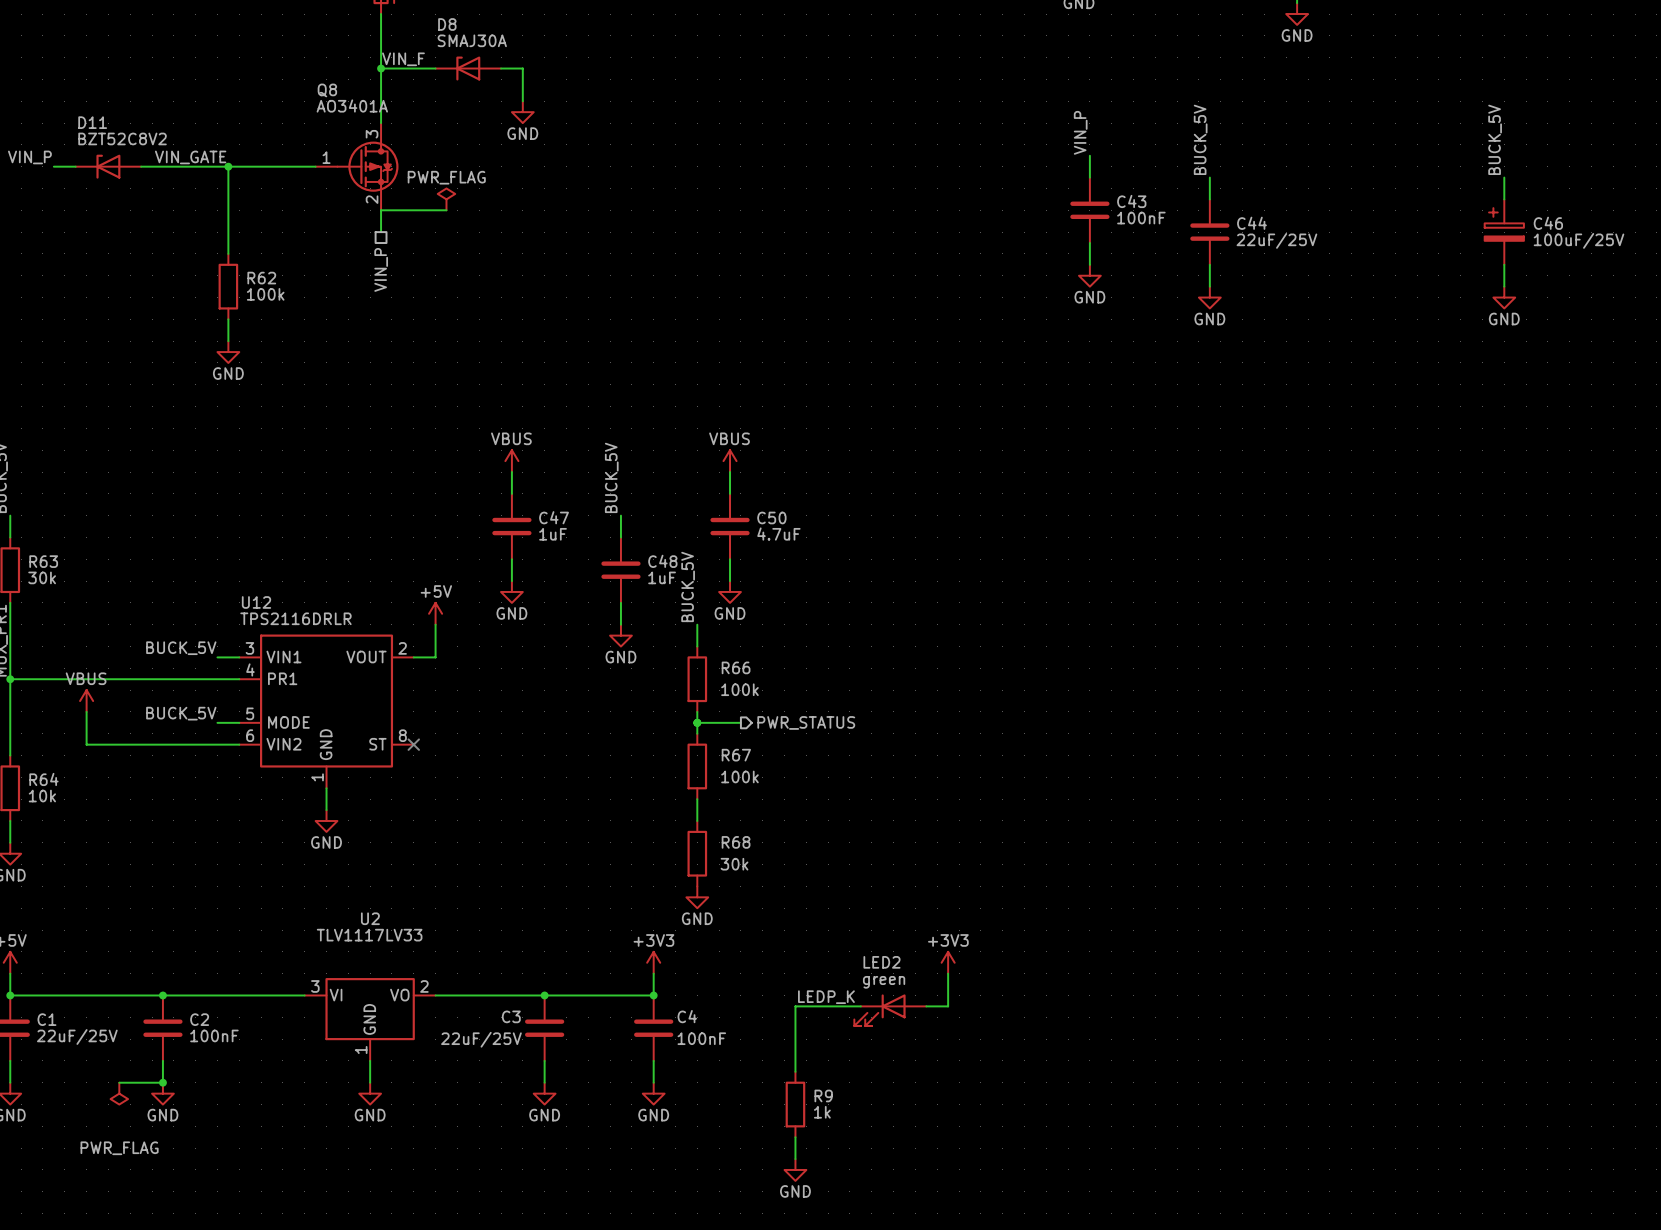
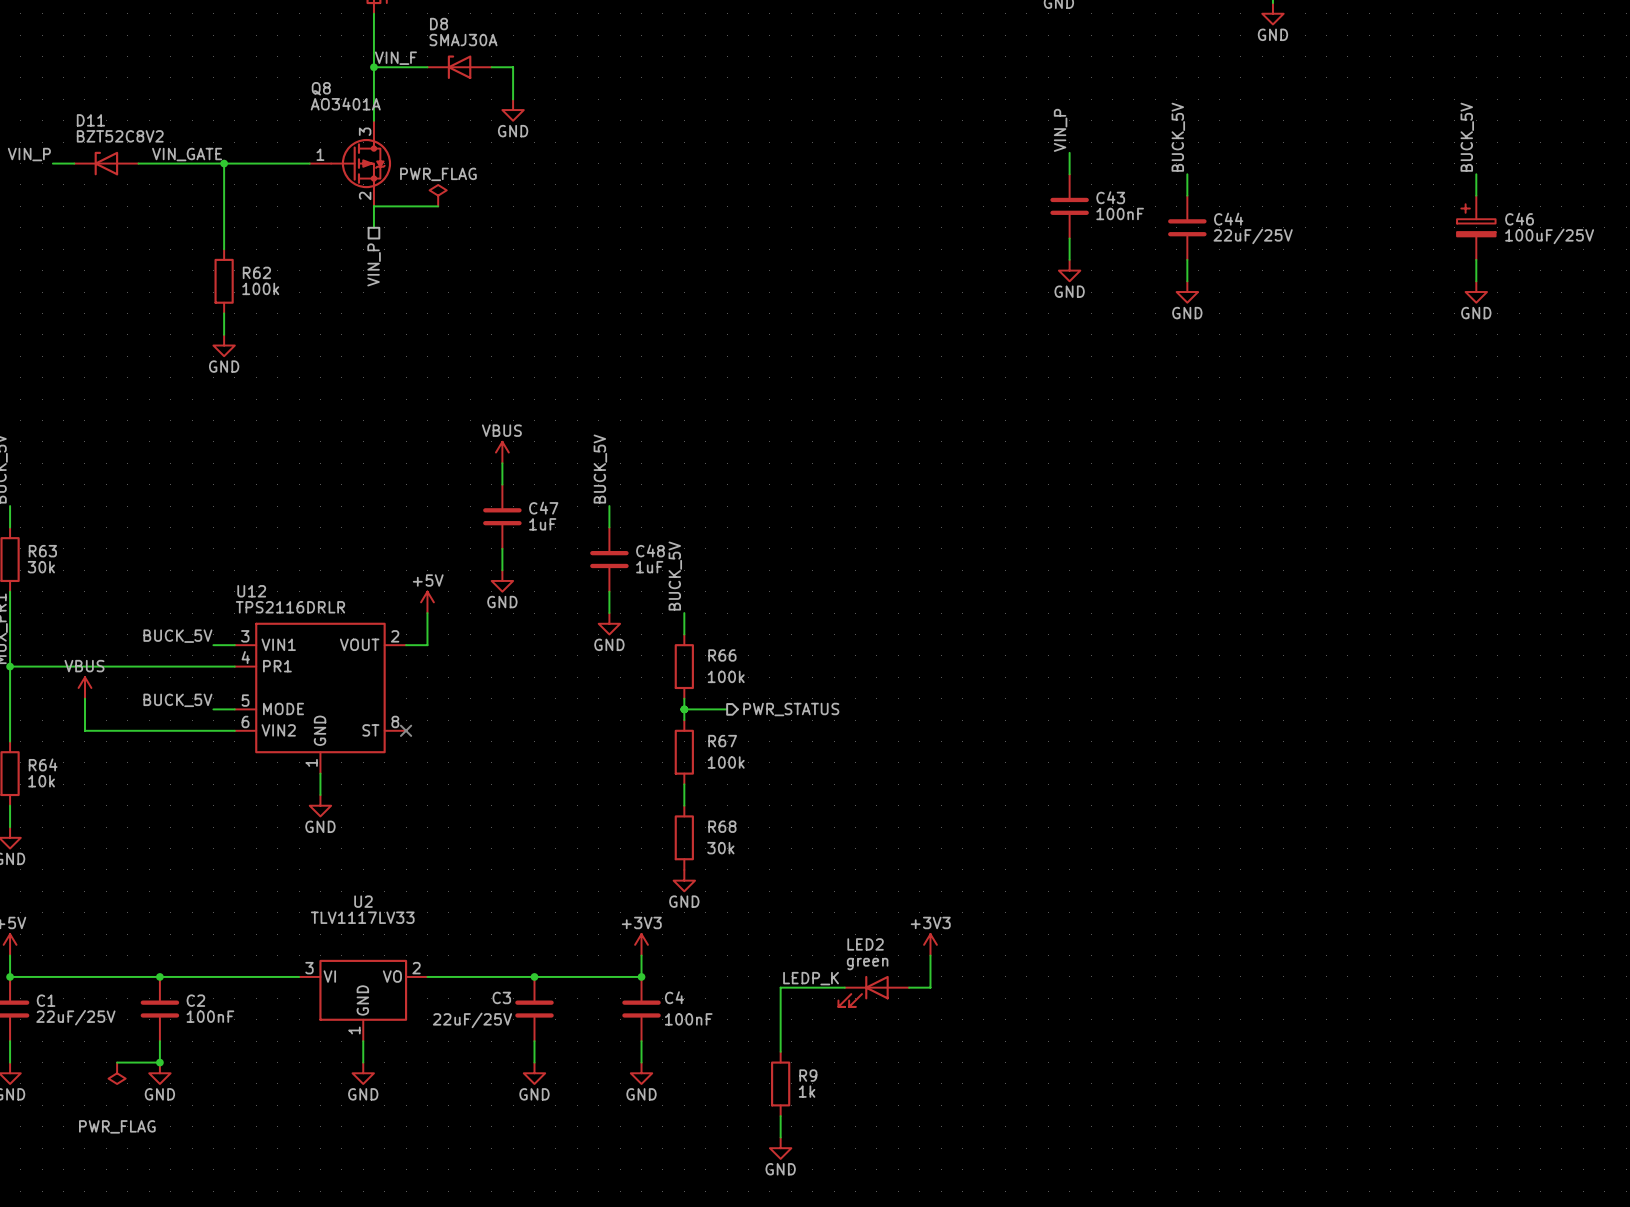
power symbol: VBUS (730, 461) -> none
wire: (730, 472) (730, 493) -> none
C50: 4.7uF (730, 526) -> none
wire: (730, 559) (730, 581) -> none
power symbol: GND (730, 591) -> none

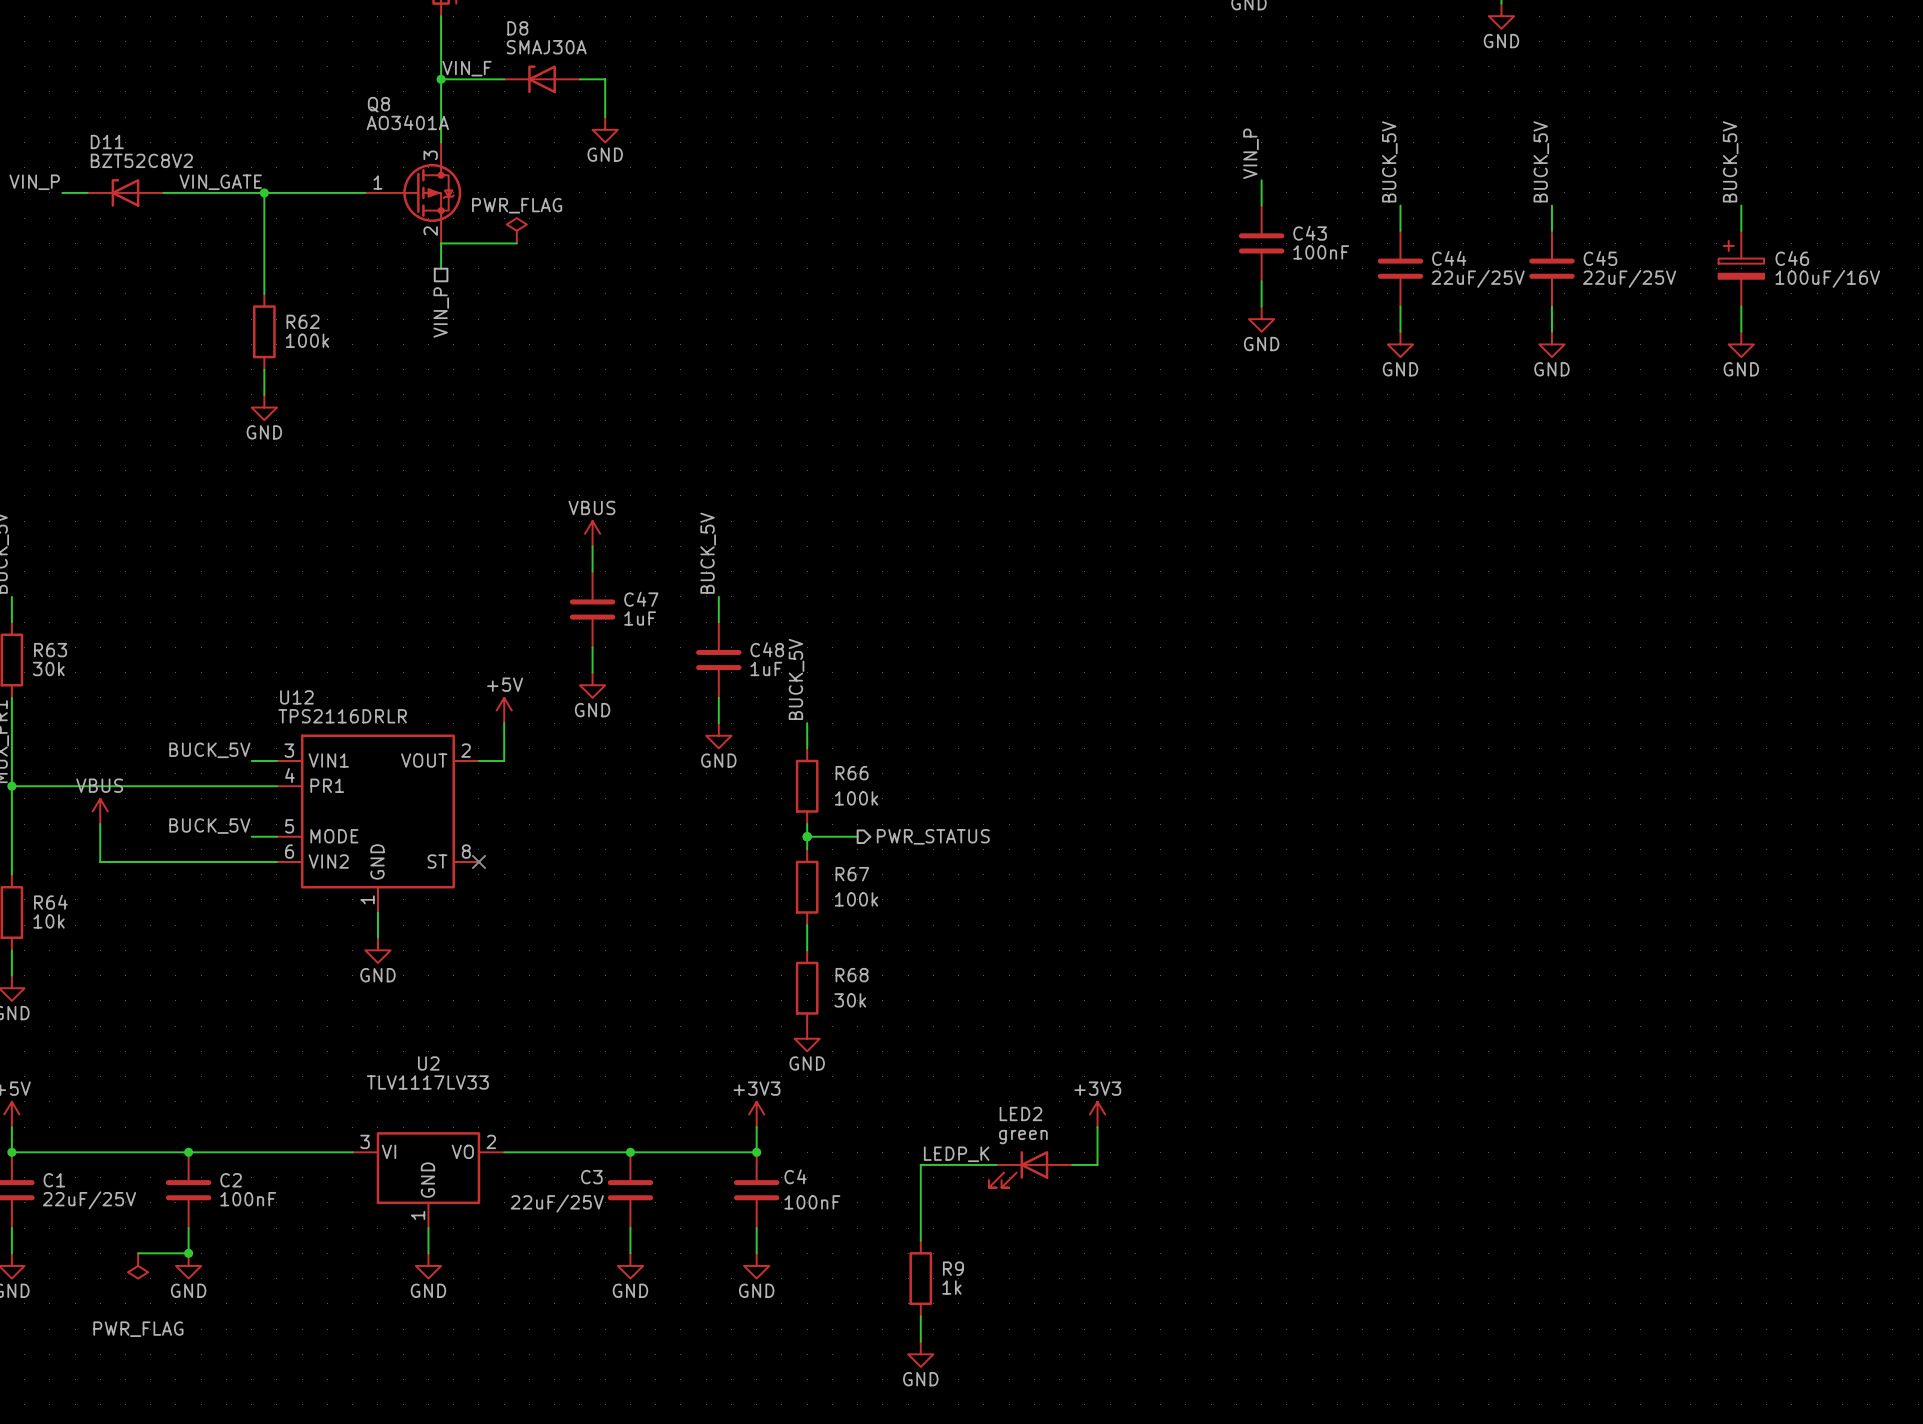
label: none -> BUCK_5V (1541, 161)
wire: none -> (1551, 205) (1551, 230)
C45: none -> 22uF/25V (1551, 268)
C46 value: 100uF/25V (1549, 236) -> 100uF/16V (1827, 278)
wire: none -> (1551, 306) (1551, 331)
power symbol: none -> GND (1551, 344)

